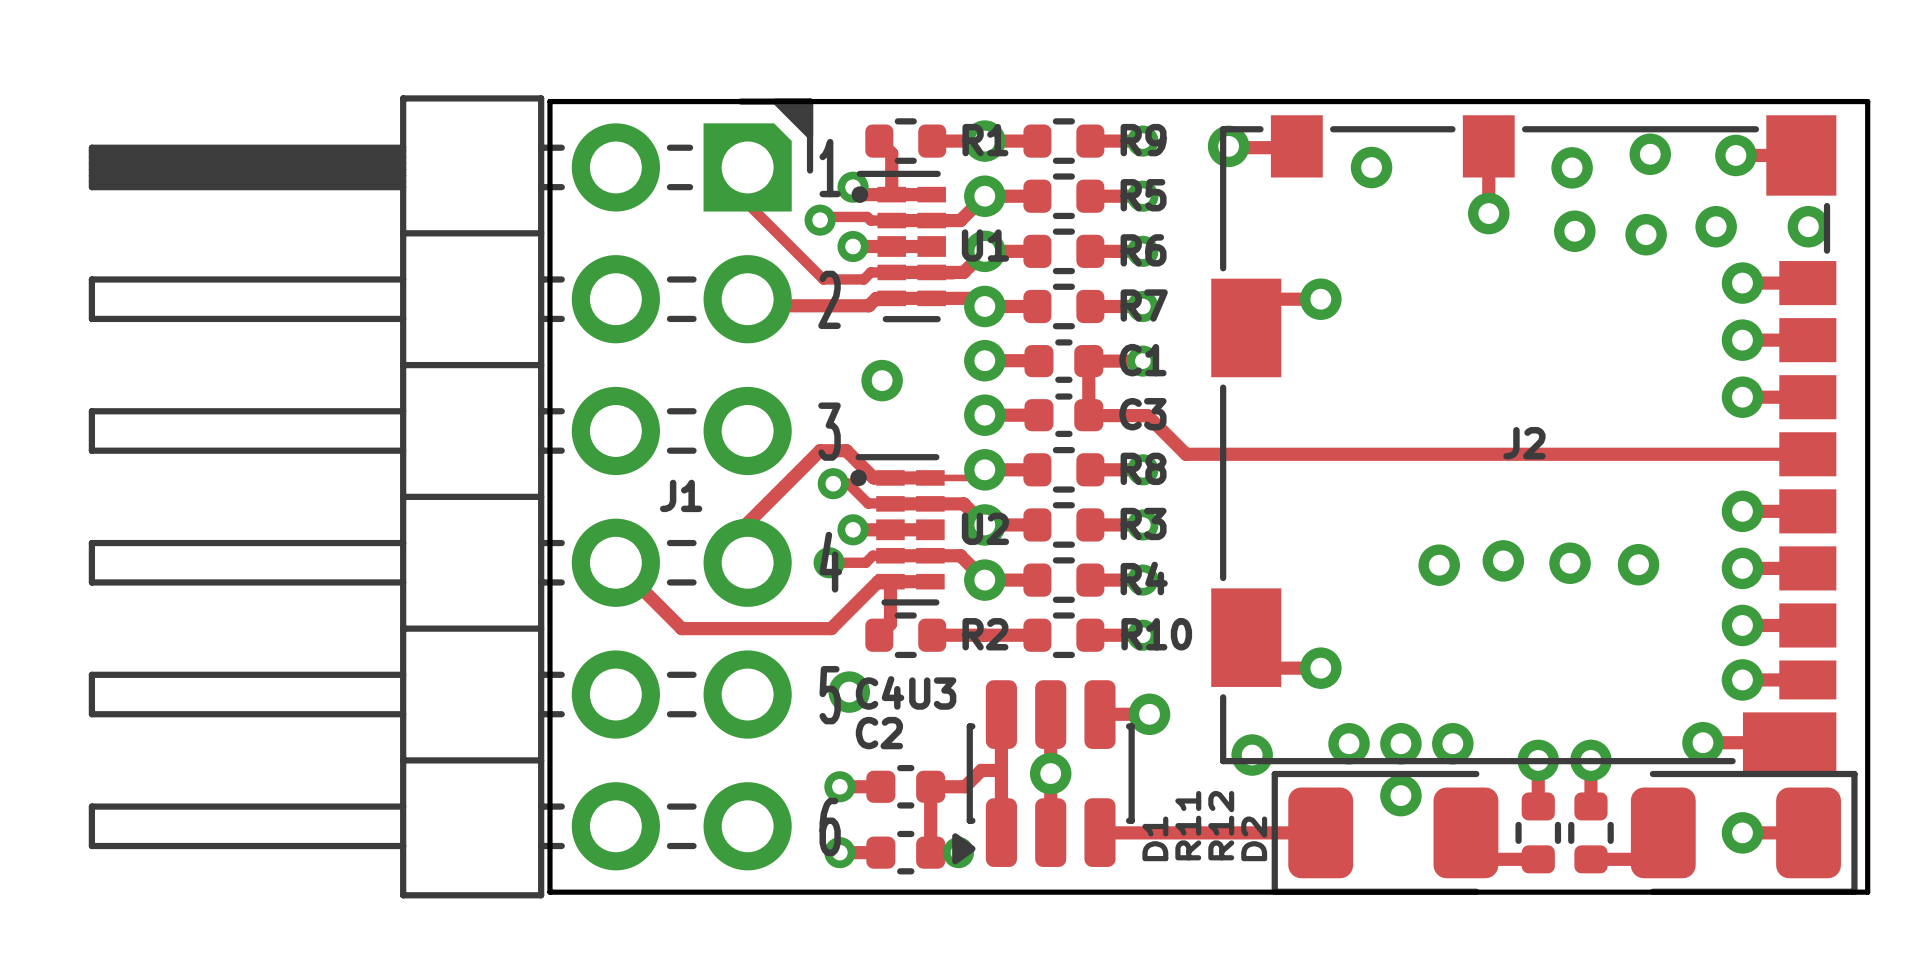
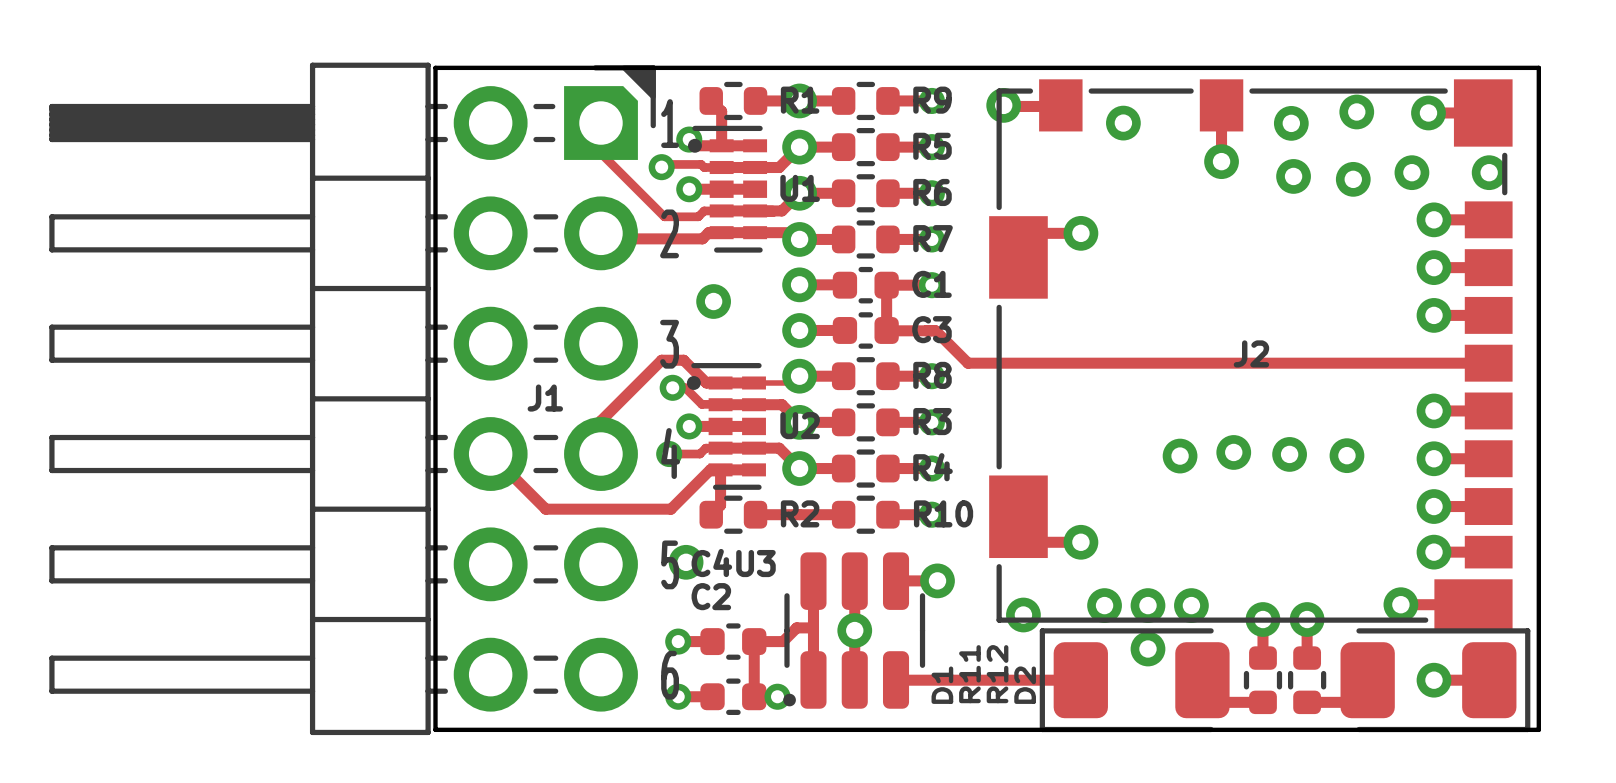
U3 footprint: [952, 680, 1135, 867] -> [783, 552, 926, 709]

